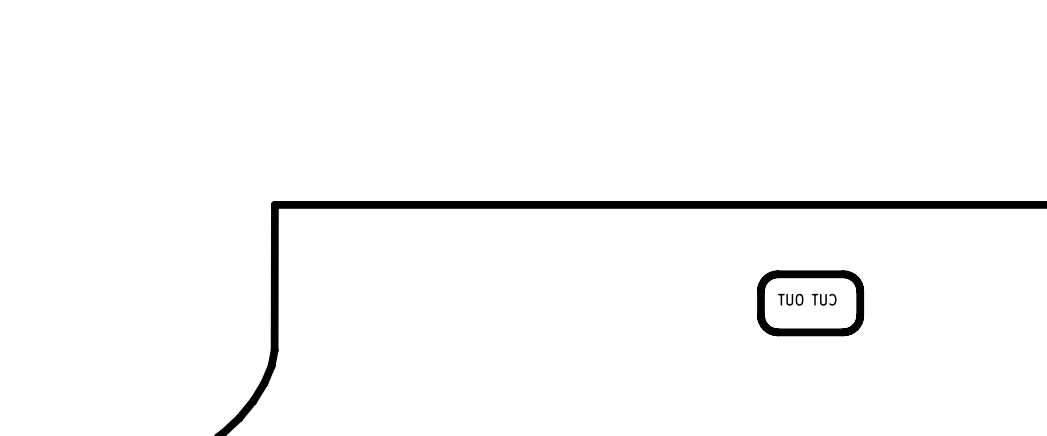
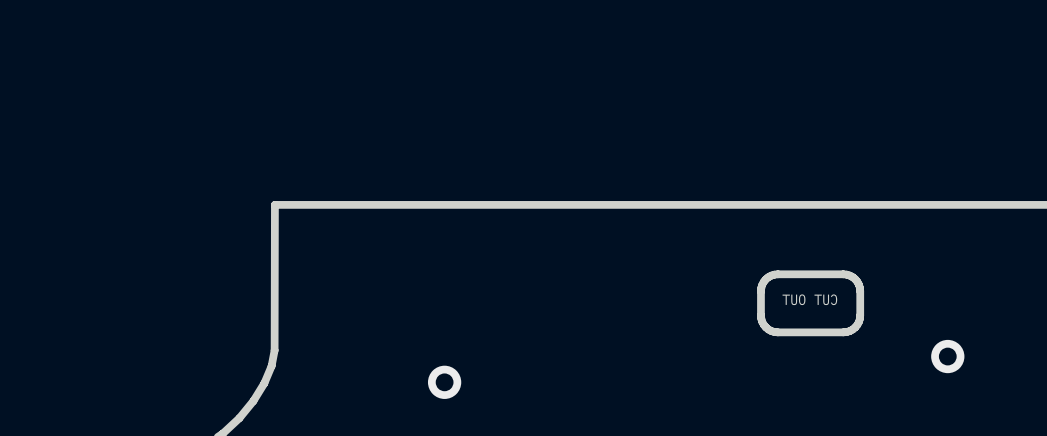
via: none -> (947, 356)
via: none -> (444, 382)

